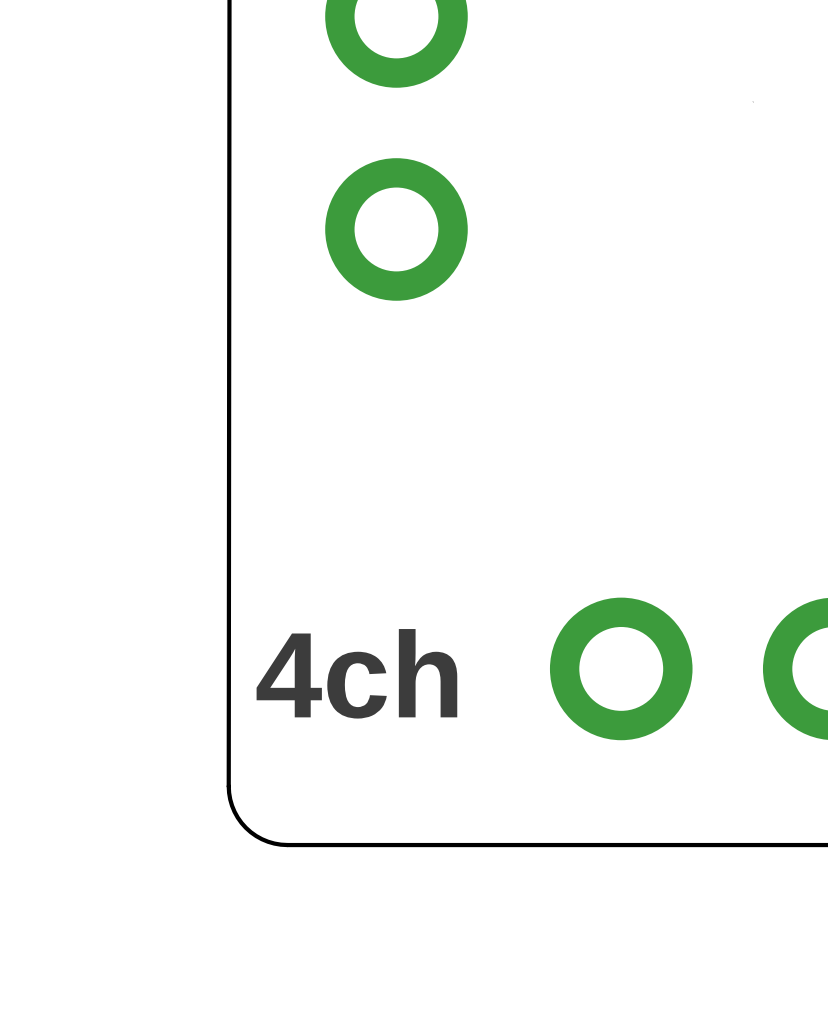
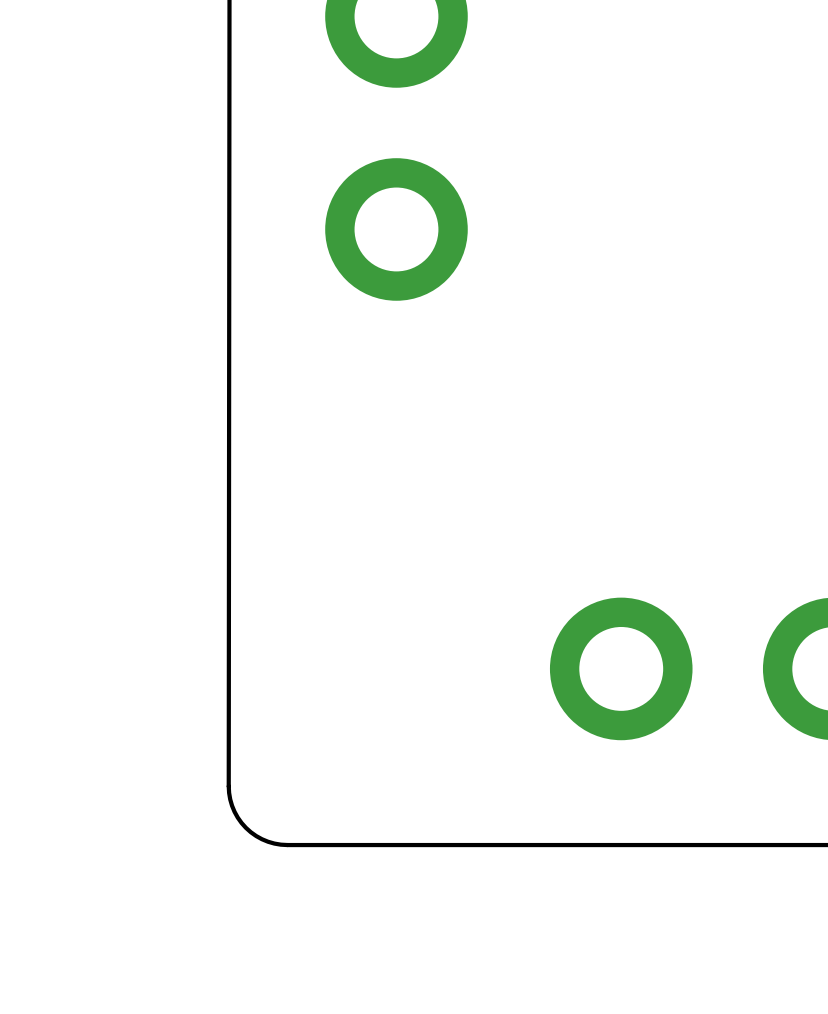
text: 4ch (356, 673) -> none

